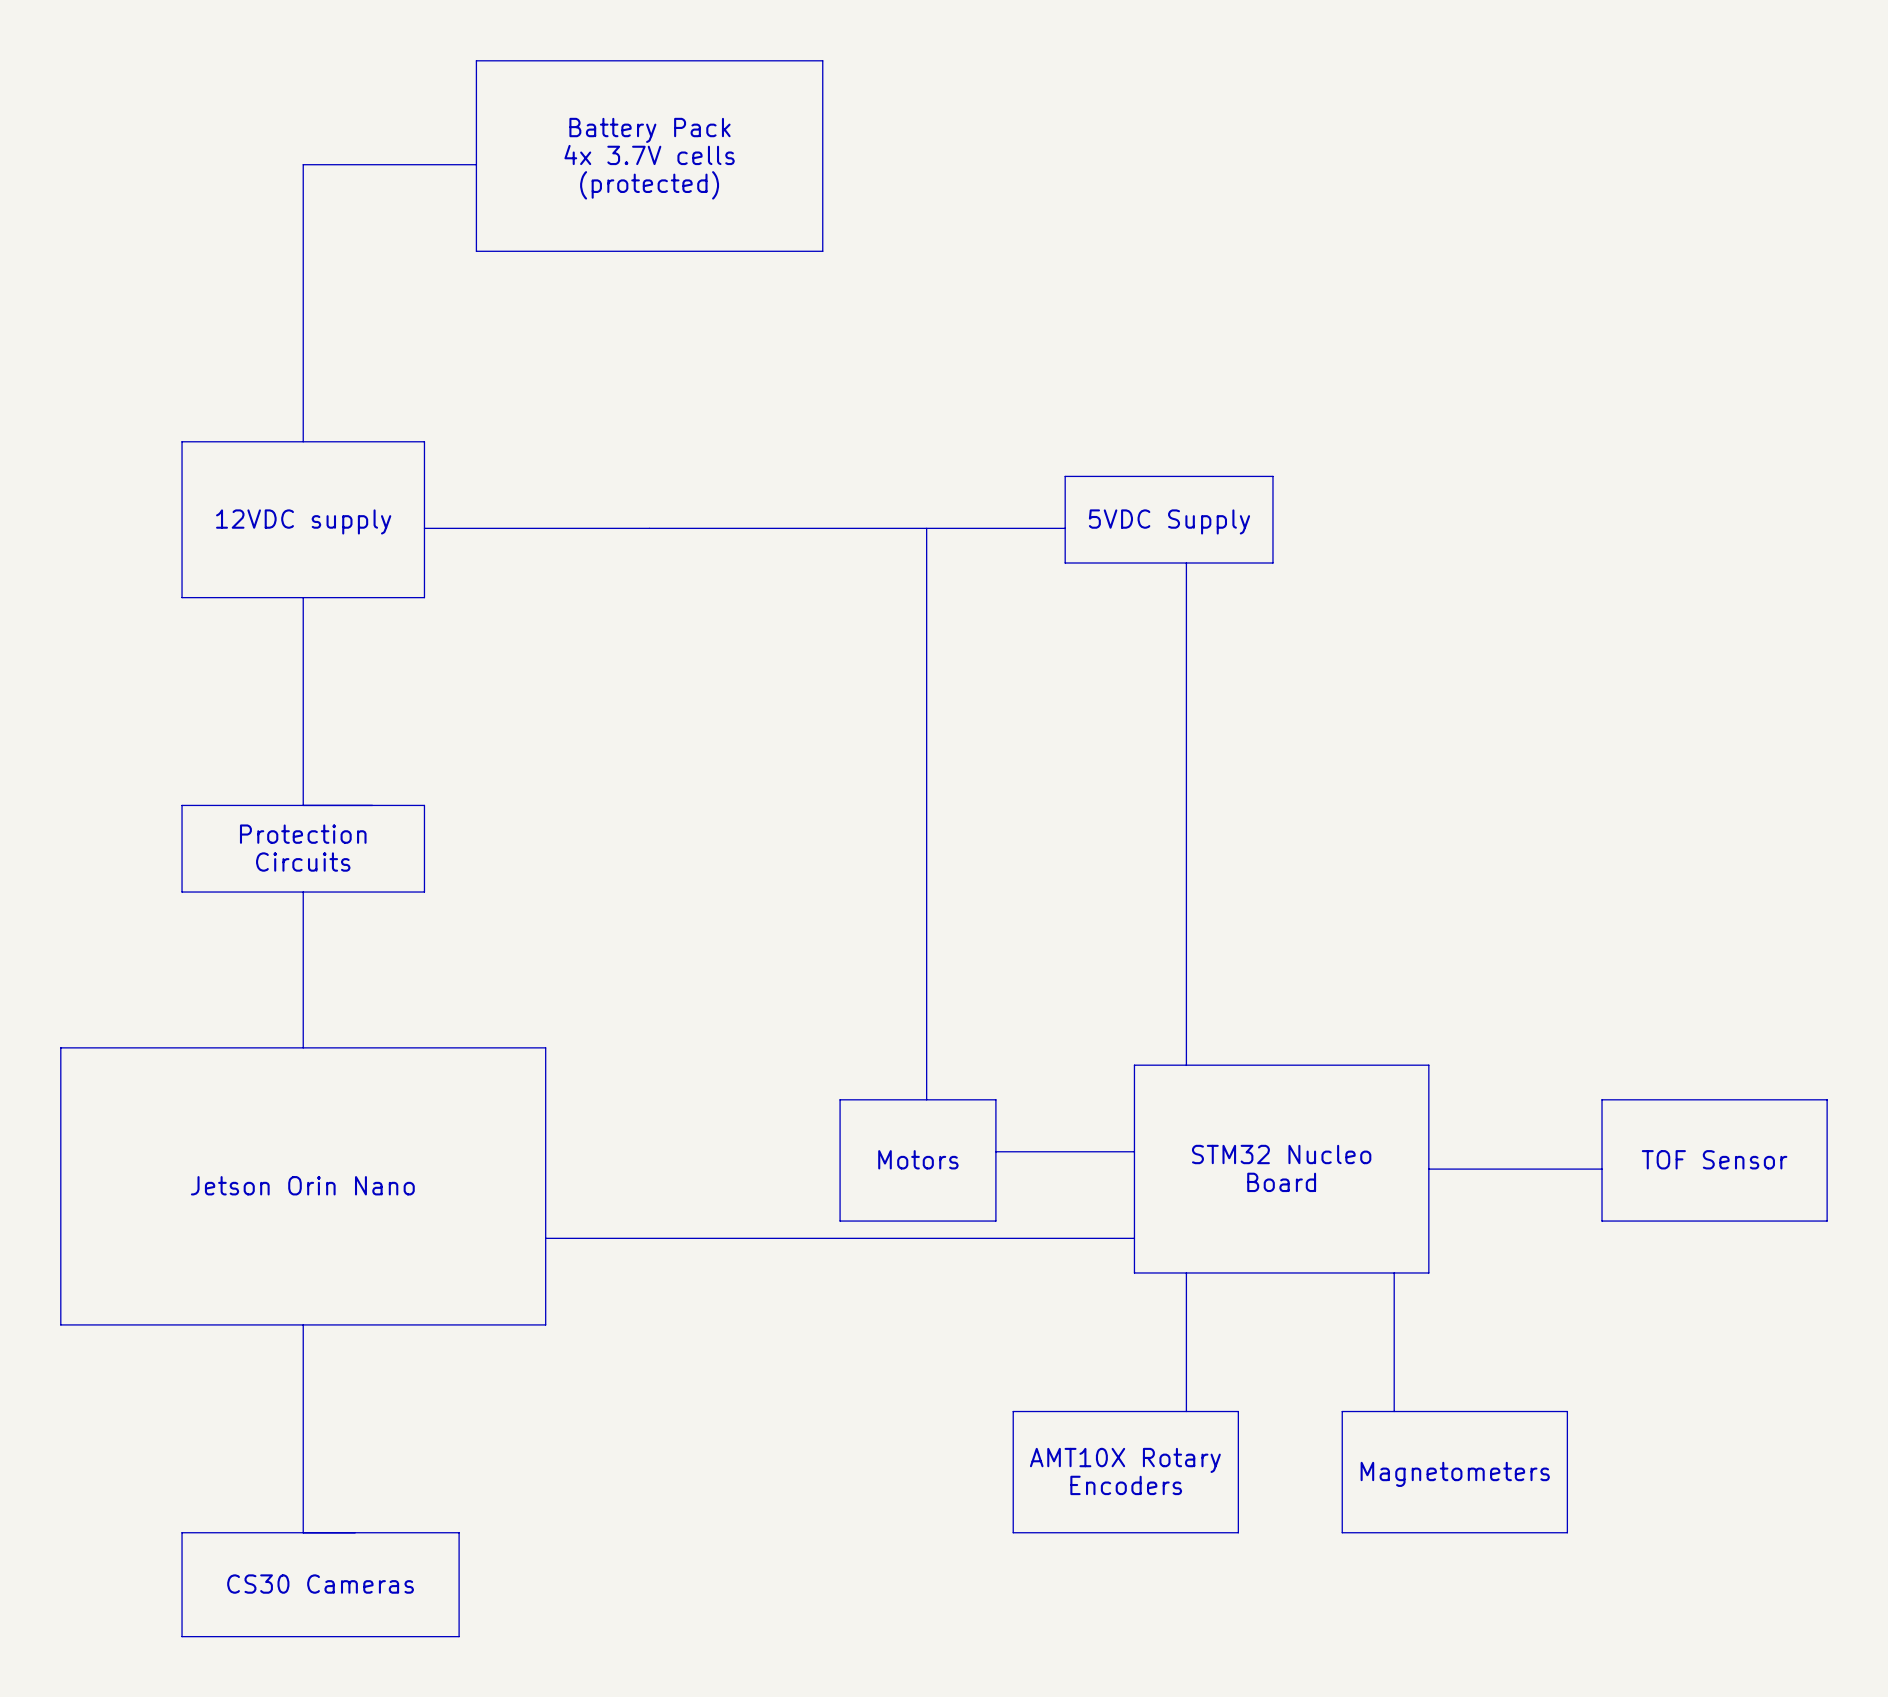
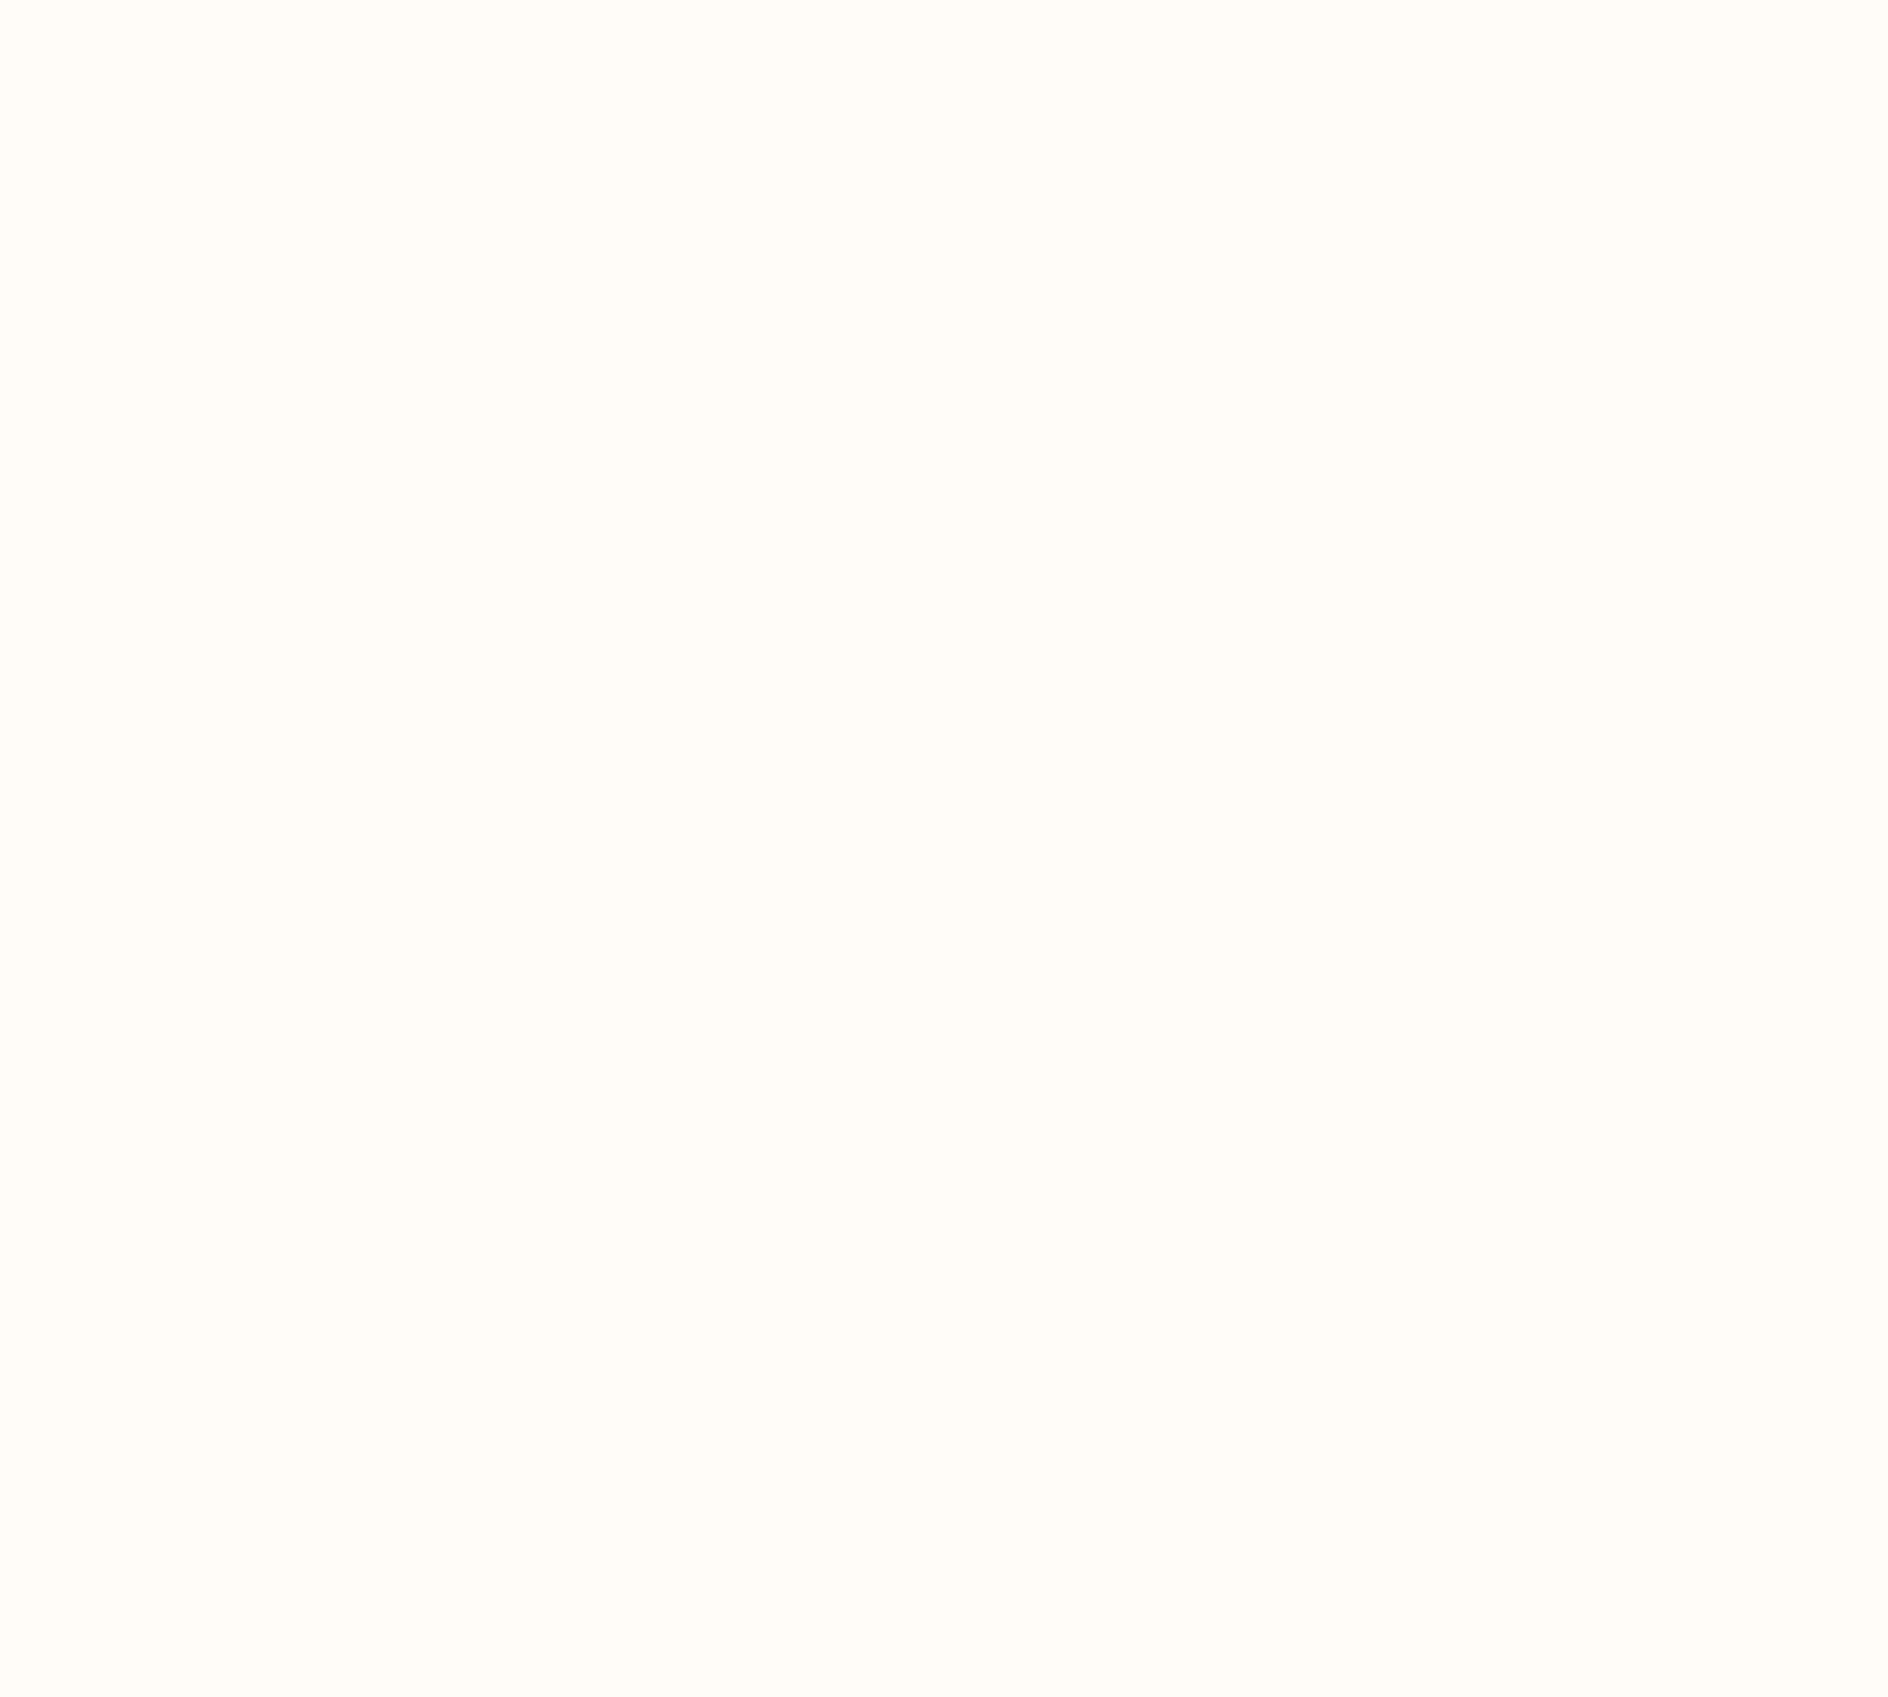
line: (476, 60) (822, 60) (822, 251) (476, 251) (476, 60) -> none
text: Battery Pack (649, 130) -> none
text: 4x 3.7V cells (649, 154) -> none
line: (476, 164) (303, 164) (303, 441) -> none
text: (protected) (649, 185) -> none
line: (182, 441) (182, 597) (424, 597) (424, 441) (182, 441) -> none
line: (1065, 476) (1272, 476) (1272, 562) (1065, 562) (1065, 476) -> none
text: 12VDC supply (303, 521) -> none
text: 5VDC Supply (1169, 521) -> none
line: (424, 528) (1065, 528) -> none
line: (926, 528) (926, 1099) -> none
line: (1186, 562) (1186, 1065) -> none
line: (303, 597) (303, 805) -> none
line: (182, 805) (182, 892) (424, 892) (424, 805) (182, 805) -> none
text: Protection (303, 834) -> none
text: Circuits (303, 862) -> none
line: (303, 892) (303, 1047) -> none
line: (60, 1047) (545, 1047) (545, 1324) (60, 1324) (60, 1047) -> none
line: (1134, 1065) (1428, 1065) (1428, 1272) (1134, 1272) (1134, 1065) -> none
line: (840, 1099) (995, 1099) (995, 1221) (840, 1221) (840, 1099) -> none
line: (1602, 1099) (1827, 1099) (1827, 1221) (1602, 1221) (1602, 1099) -> none
line: (995, 1151) (1134, 1151) -> none
text: STM32 Nucleo (1281, 1154) -> none
text: Motors (918, 1159) -> none
text: TOF Sensor (1714, 1159) -> none
line: (1428, 1169) (1602, 1169) -> none
text: Board (1281, 1182) -> none
text: Jetson Orin Nano (302, 1185) -> none
line: (545, 1238) (1134, 1238) -> none
line: (1186, 1272) (1186, 1411) -> none
line: (1394, 1272) (1394, 1411) -> none
line: (303, 1324) (303, 1532) -> none
line: (1013, 1411) (1238, 1411) (1238, 1532) (1013, 1532) (1013, 1411) -> none
line: (1342, 1411) (1567, 1411) (1567, 1532) (1342, 1532) (1342, 1411) -> none
text: AMT10X Rotary (1125, 1460) -> none
text: Magnetometers (1455, 1474) -> none
text: Encoders (1126, 1485) -> none
line: (182, 1532) (459, 1532) (459, 1636) (182, 1636) (182, 1532) -> none
text: CS30 Cameras (320, 1584) -> none

